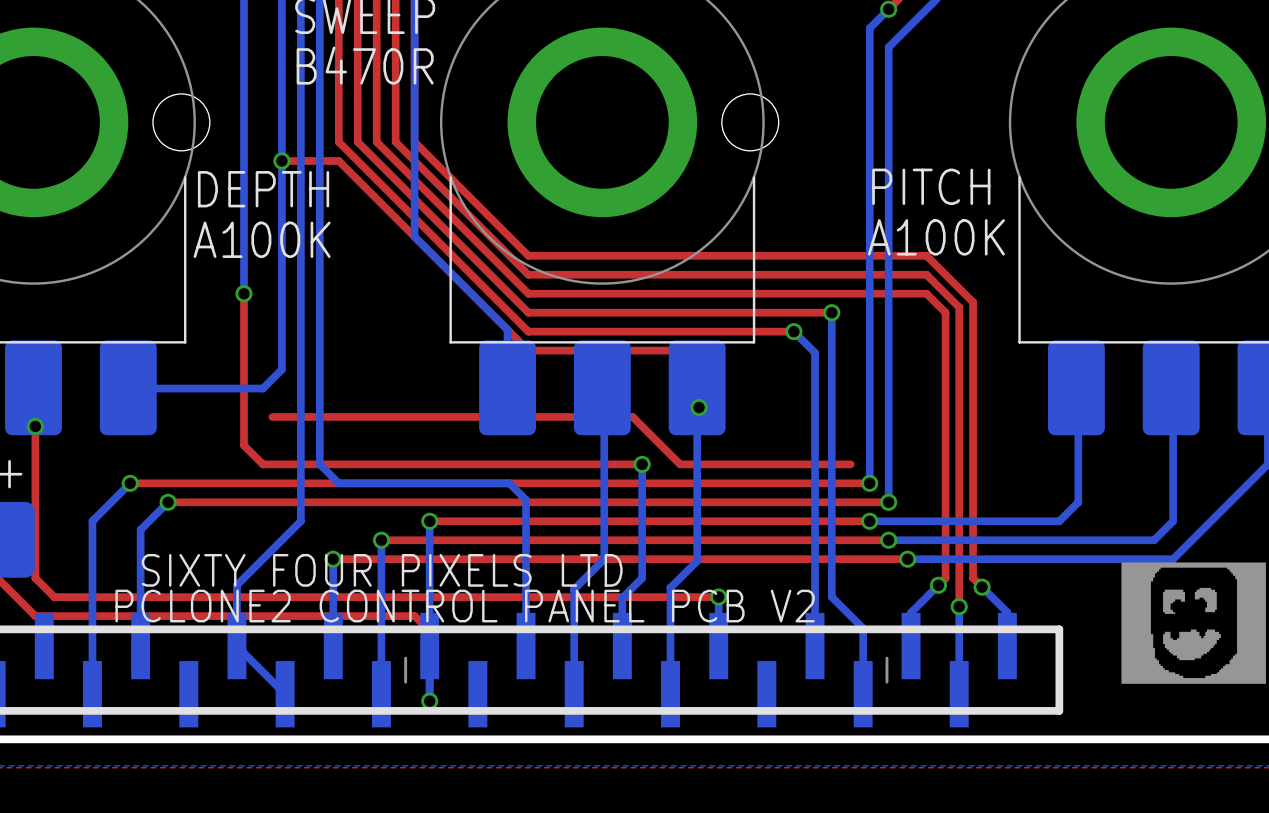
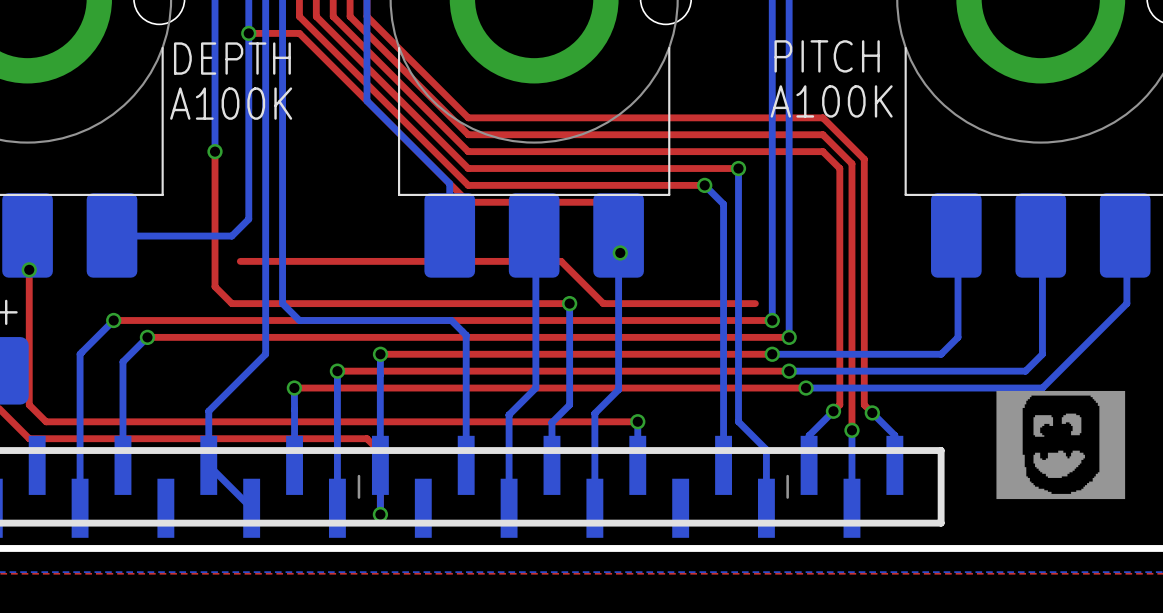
text: SIXTY FOUR PIXELS LTD (382, 570) -> none
text: PCLONE2 CONTROL PANEL PCB V2 (465, 606) -> none

